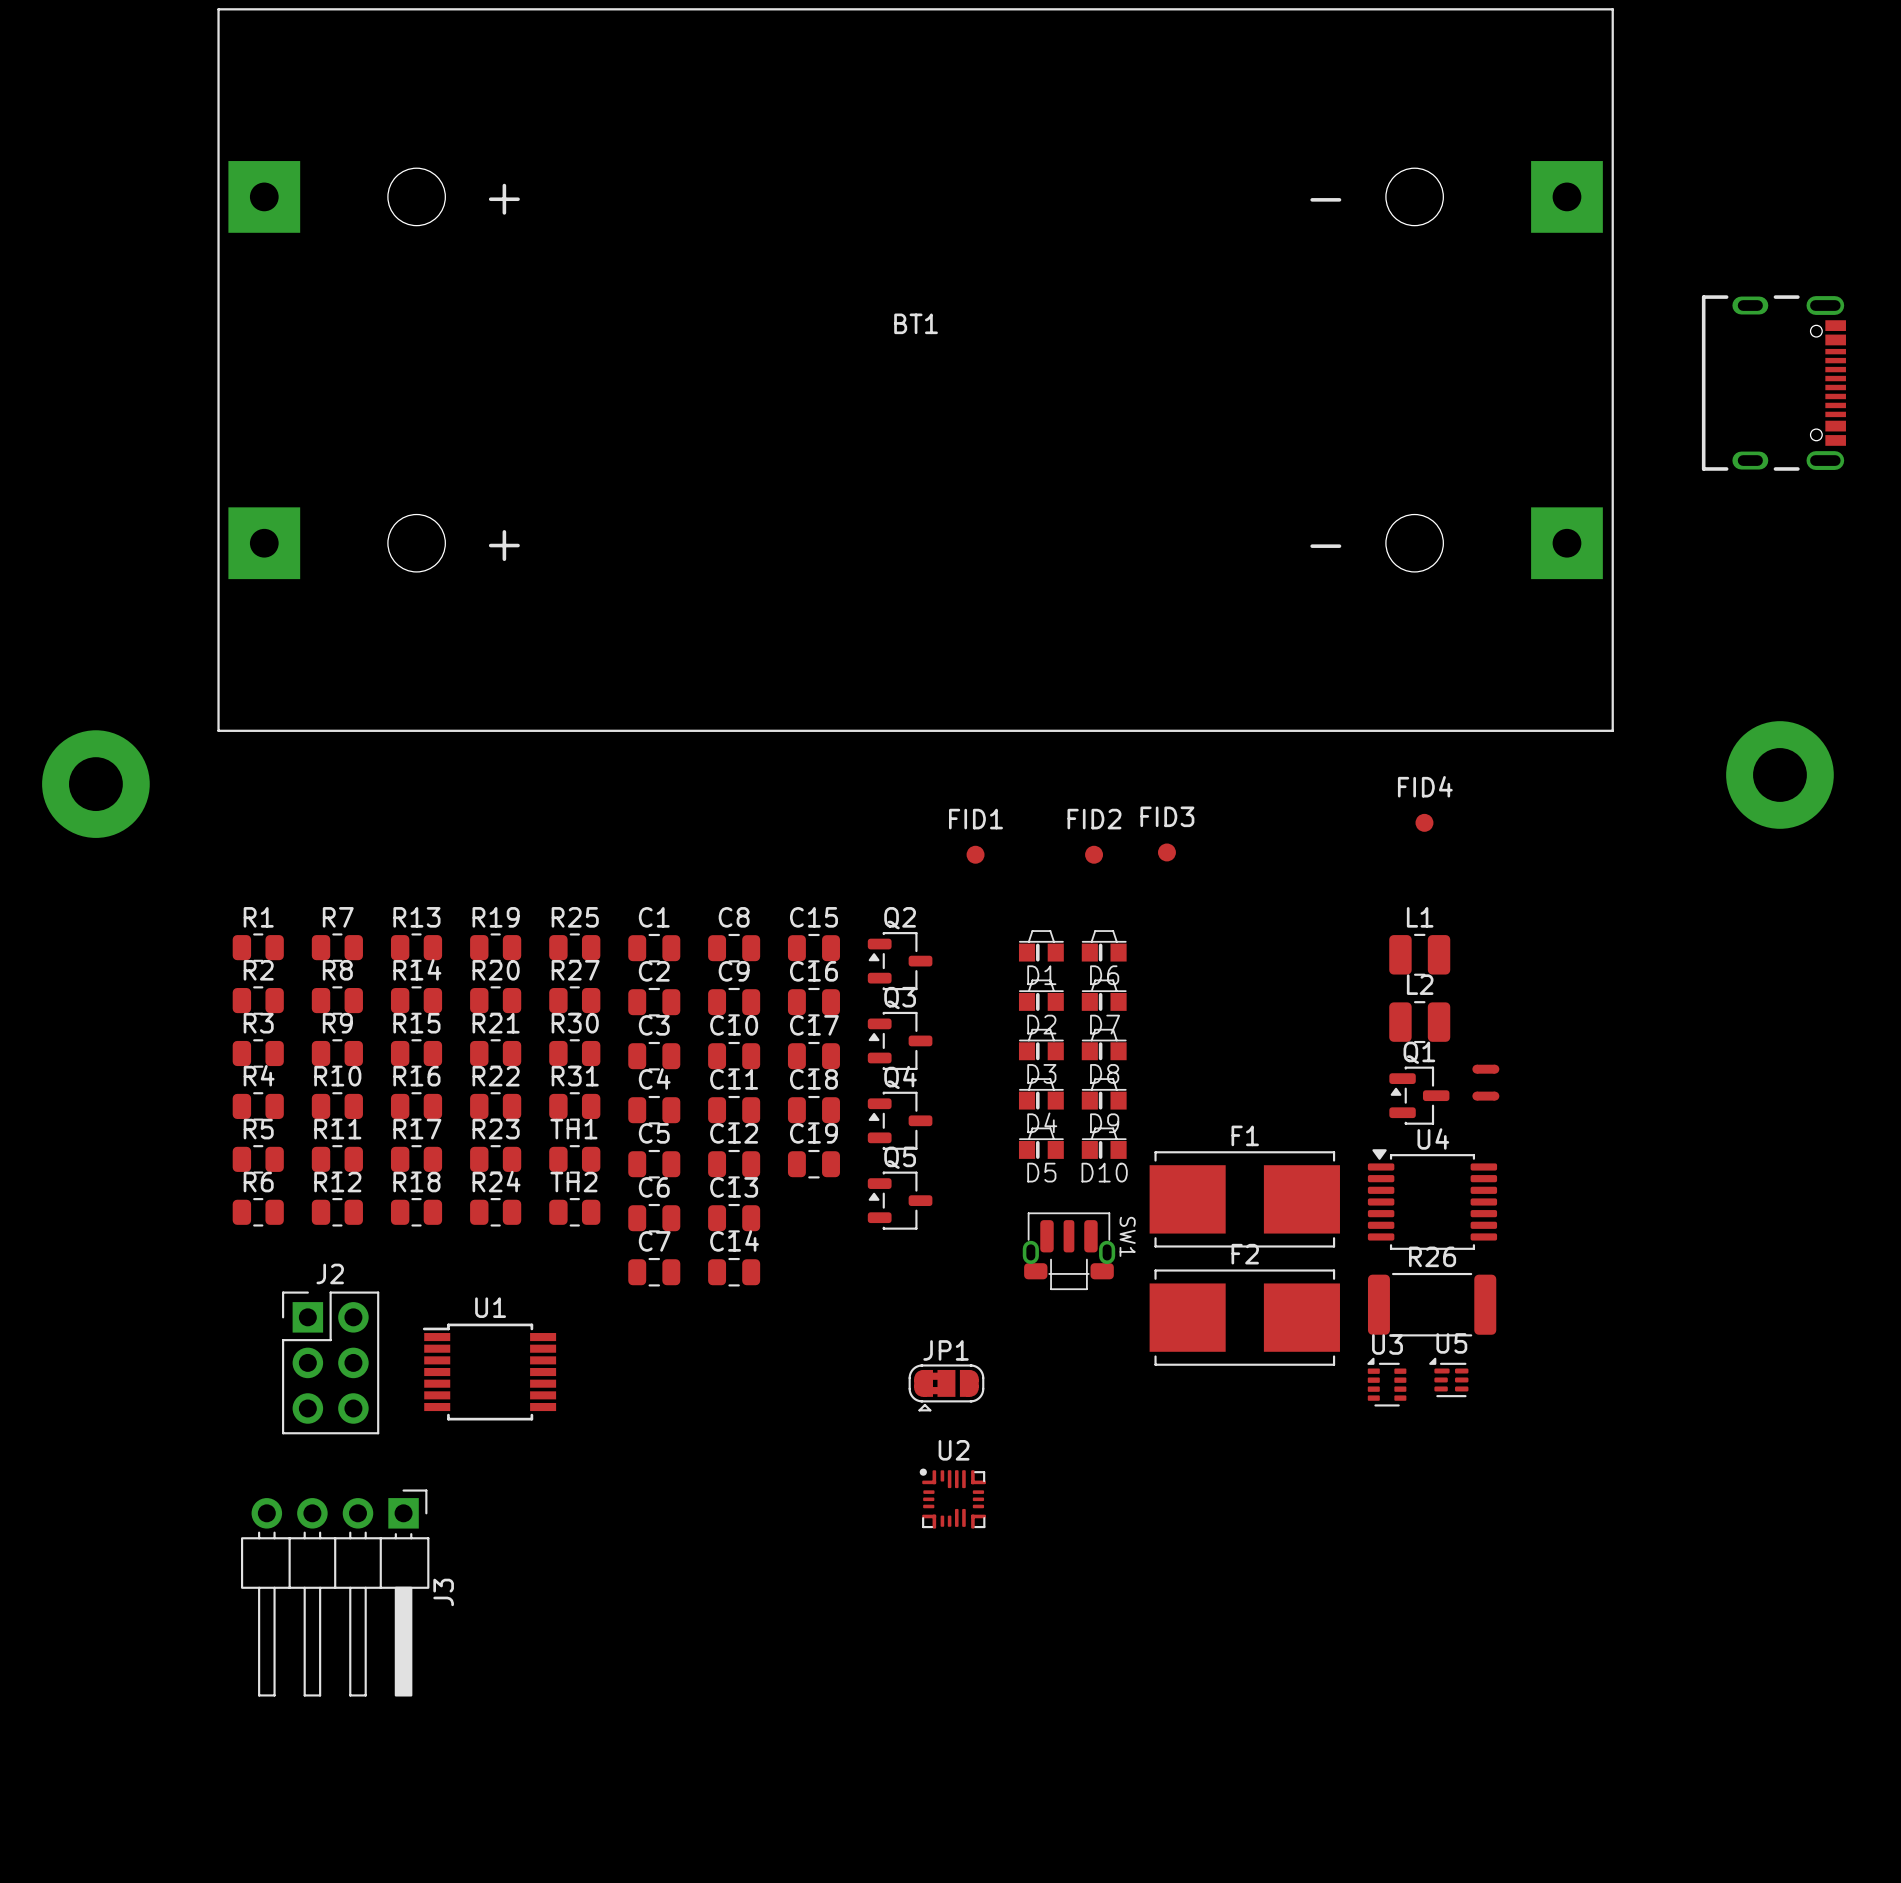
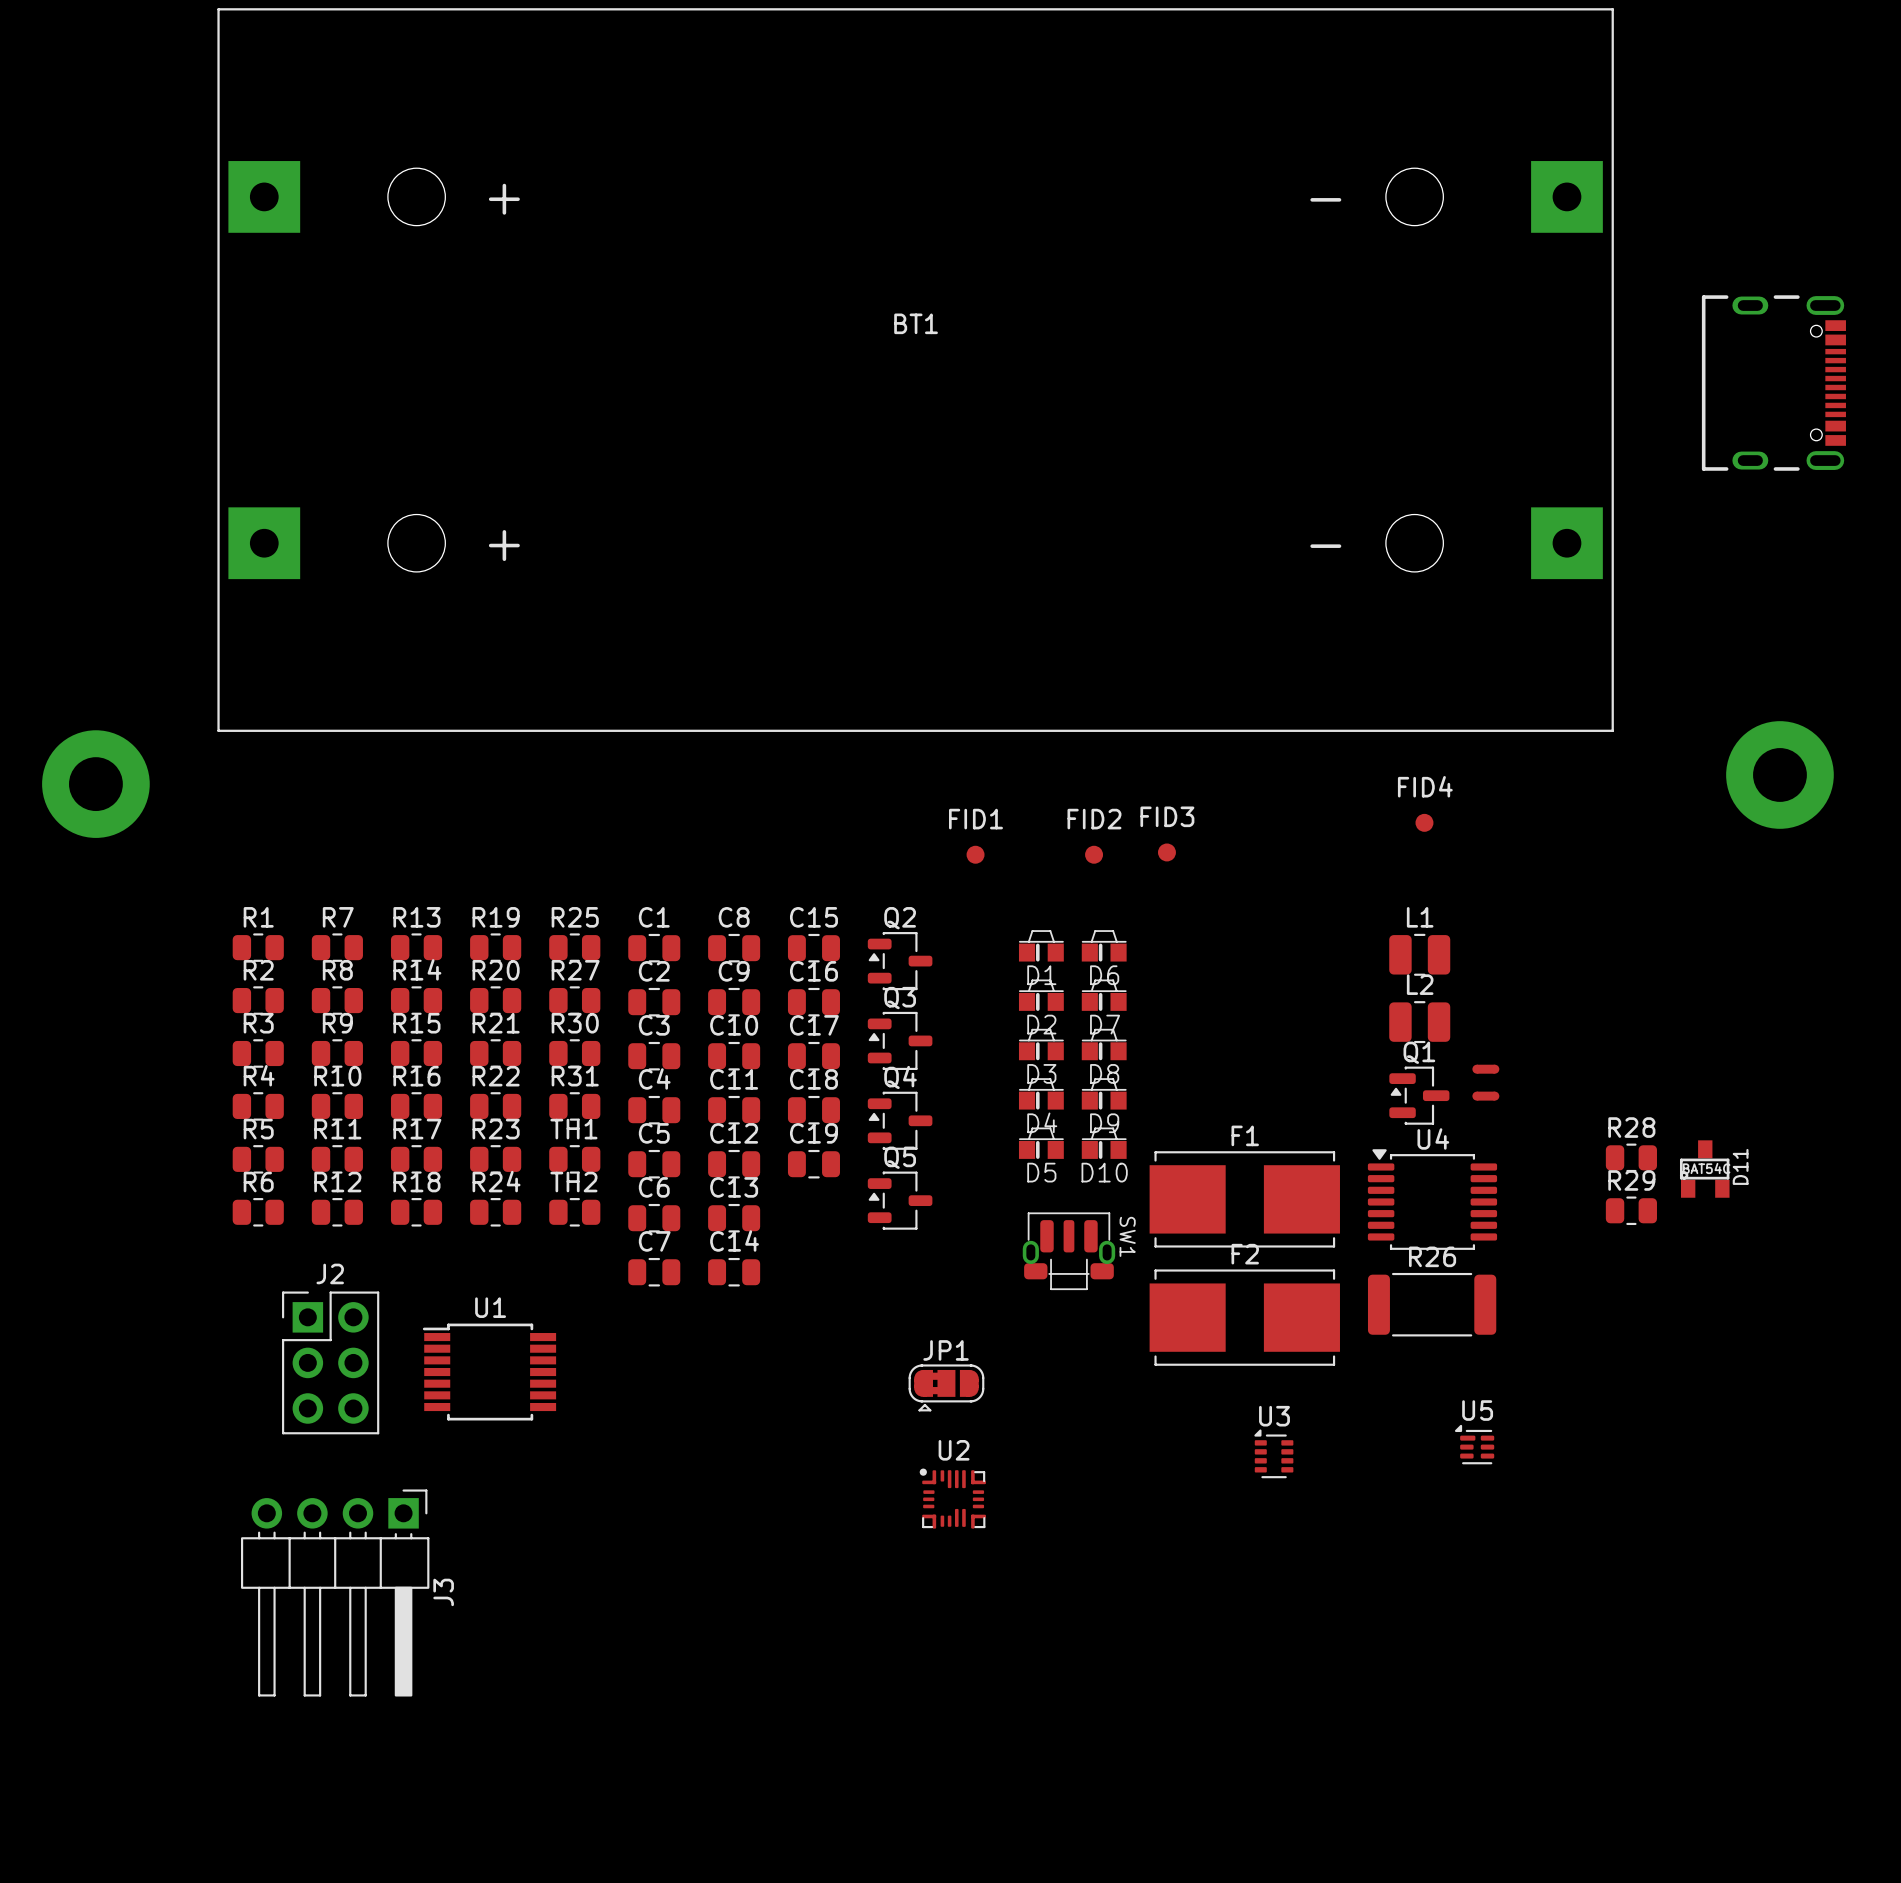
R28: none -> (1631, 1157)
D11: none -> BAT54C (1704, 1169)
R29: none -> (1631, 1210)
U5 position: (1448, 1377) -> (1474, 1444)
U3 position: (1386, 1382) -> (1273, 1453)

